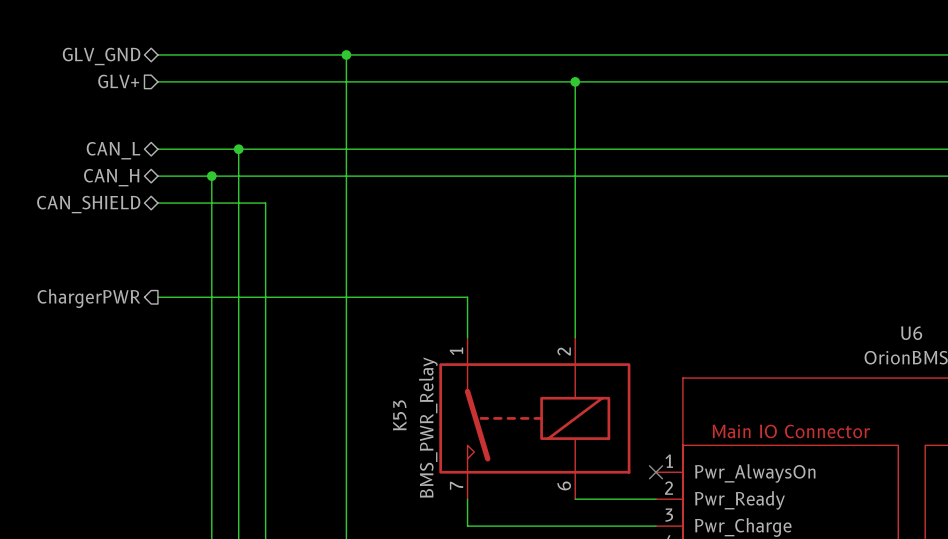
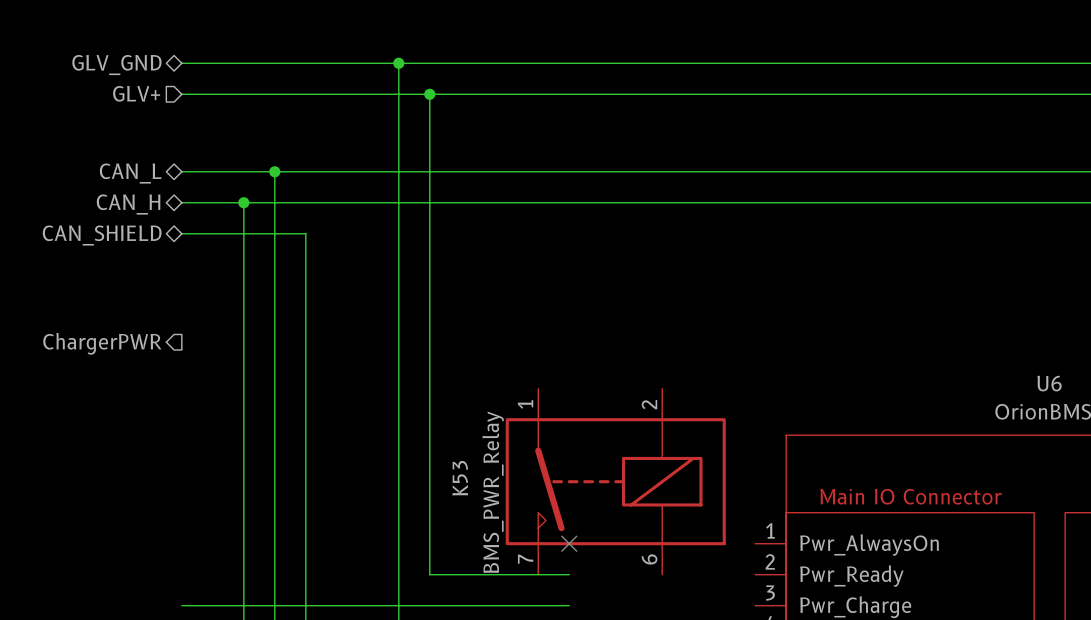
wire: none -> (429, 94) (429, 574) (569, 574)
junction: none -> (429, 94)
wire: (575, 81) (575, 337) -> none
junction: (575, 81) -> none
wire: (157, 297) (467, 297) (467, 337) -> none
no-connect mark: none -> (569, 543)
no-connect mark: (655, 472) -> none
wire: (467, 499) (467, 526) -> (181, 605) (538, 605)
wire: (575, 499) (655, 499) -> none
wire: (494, 526) (655, 526) -> none

